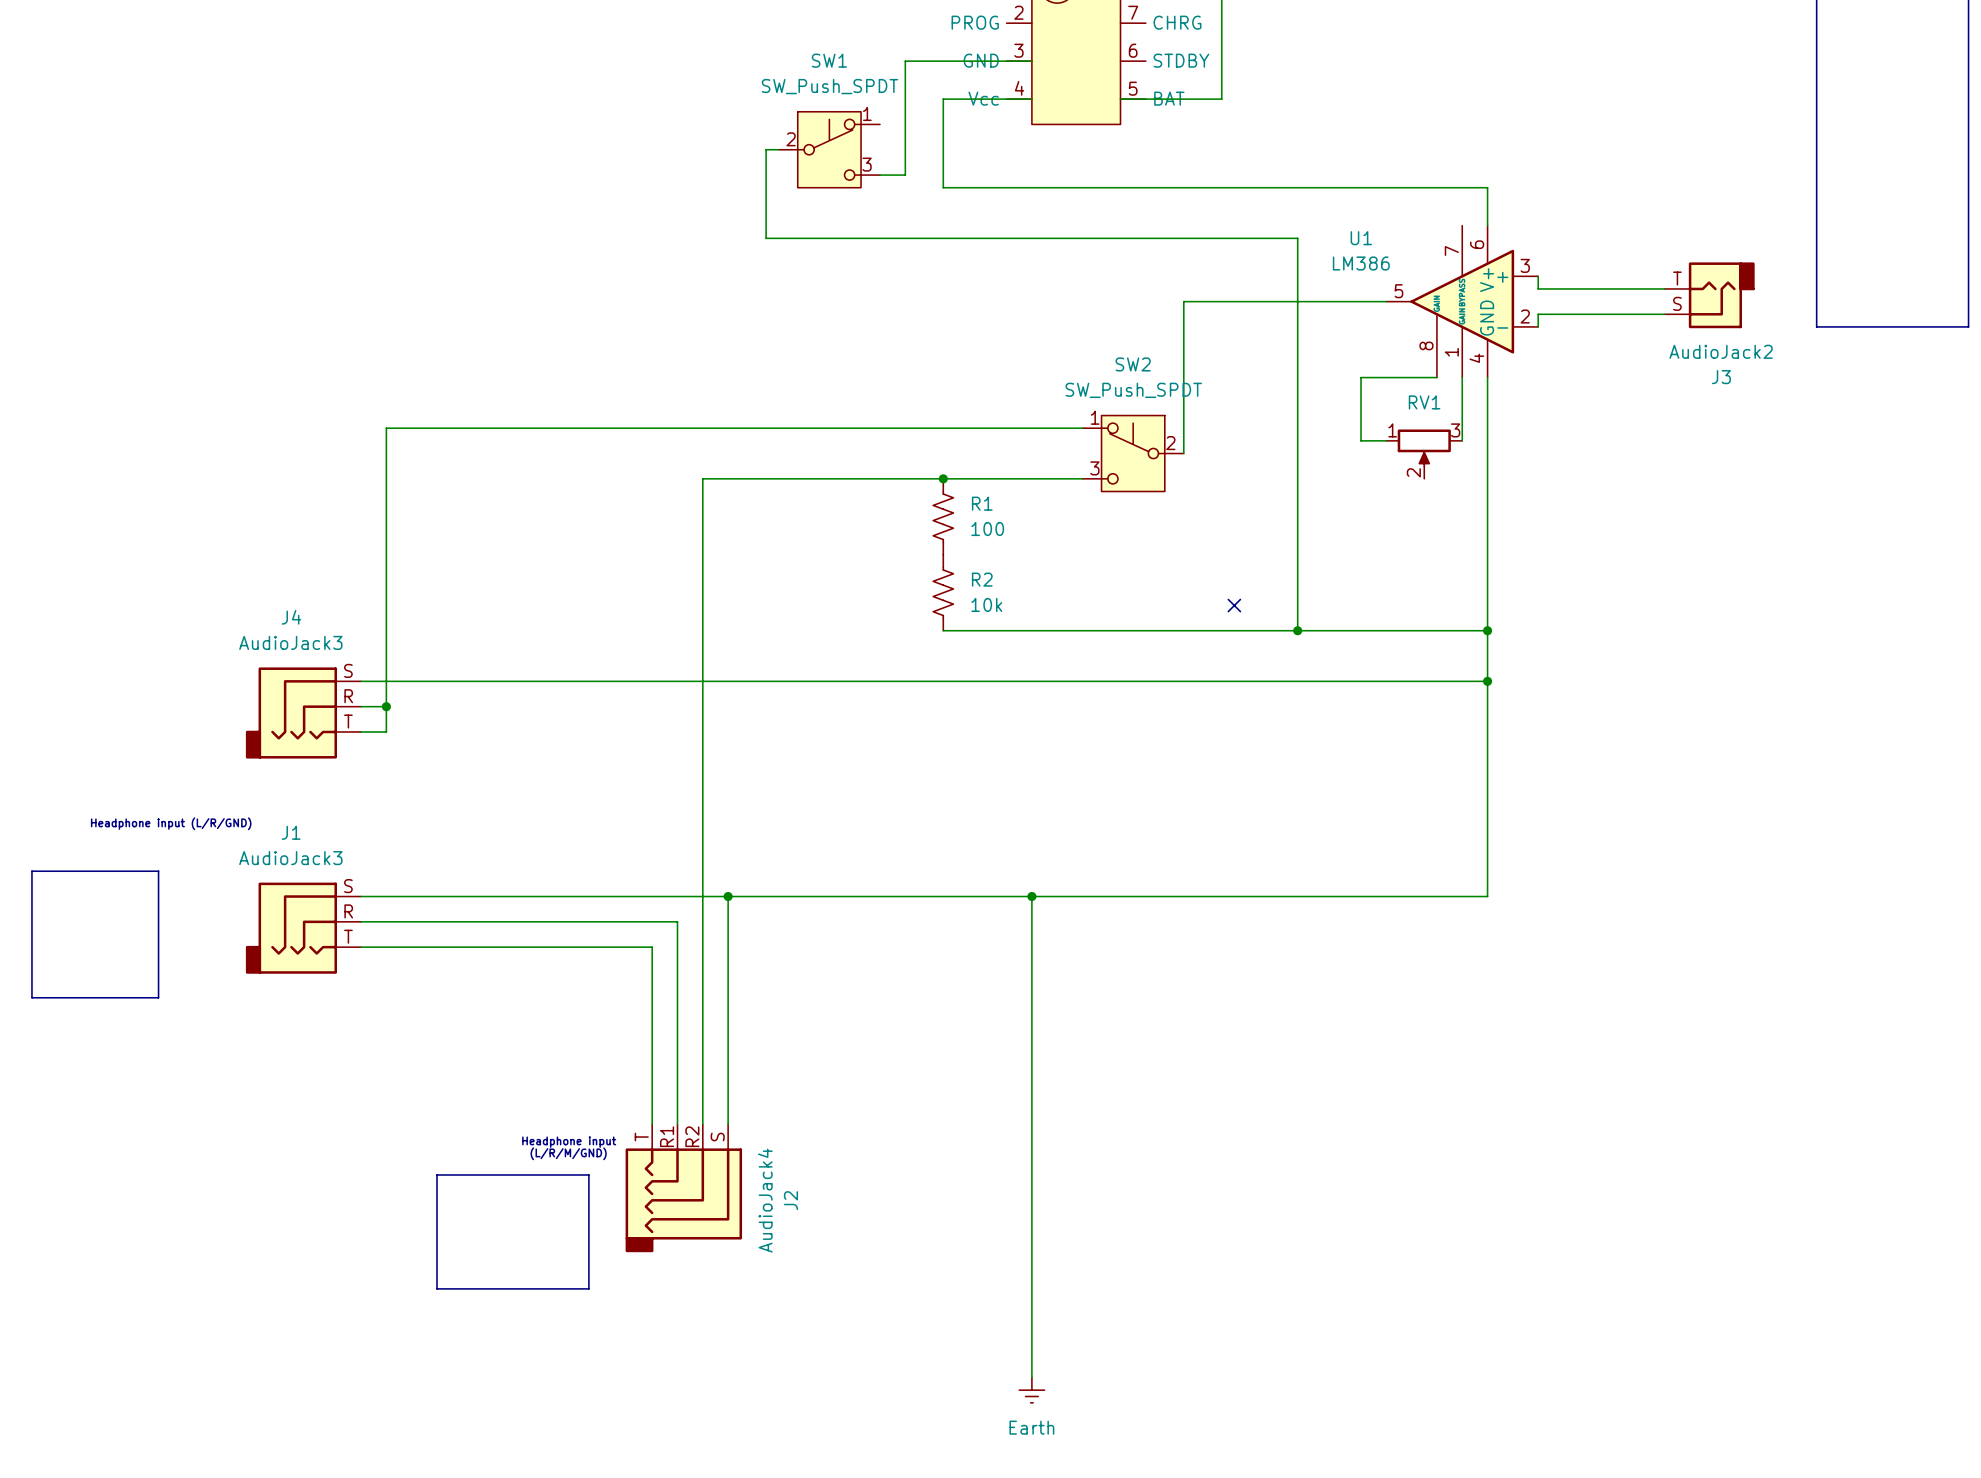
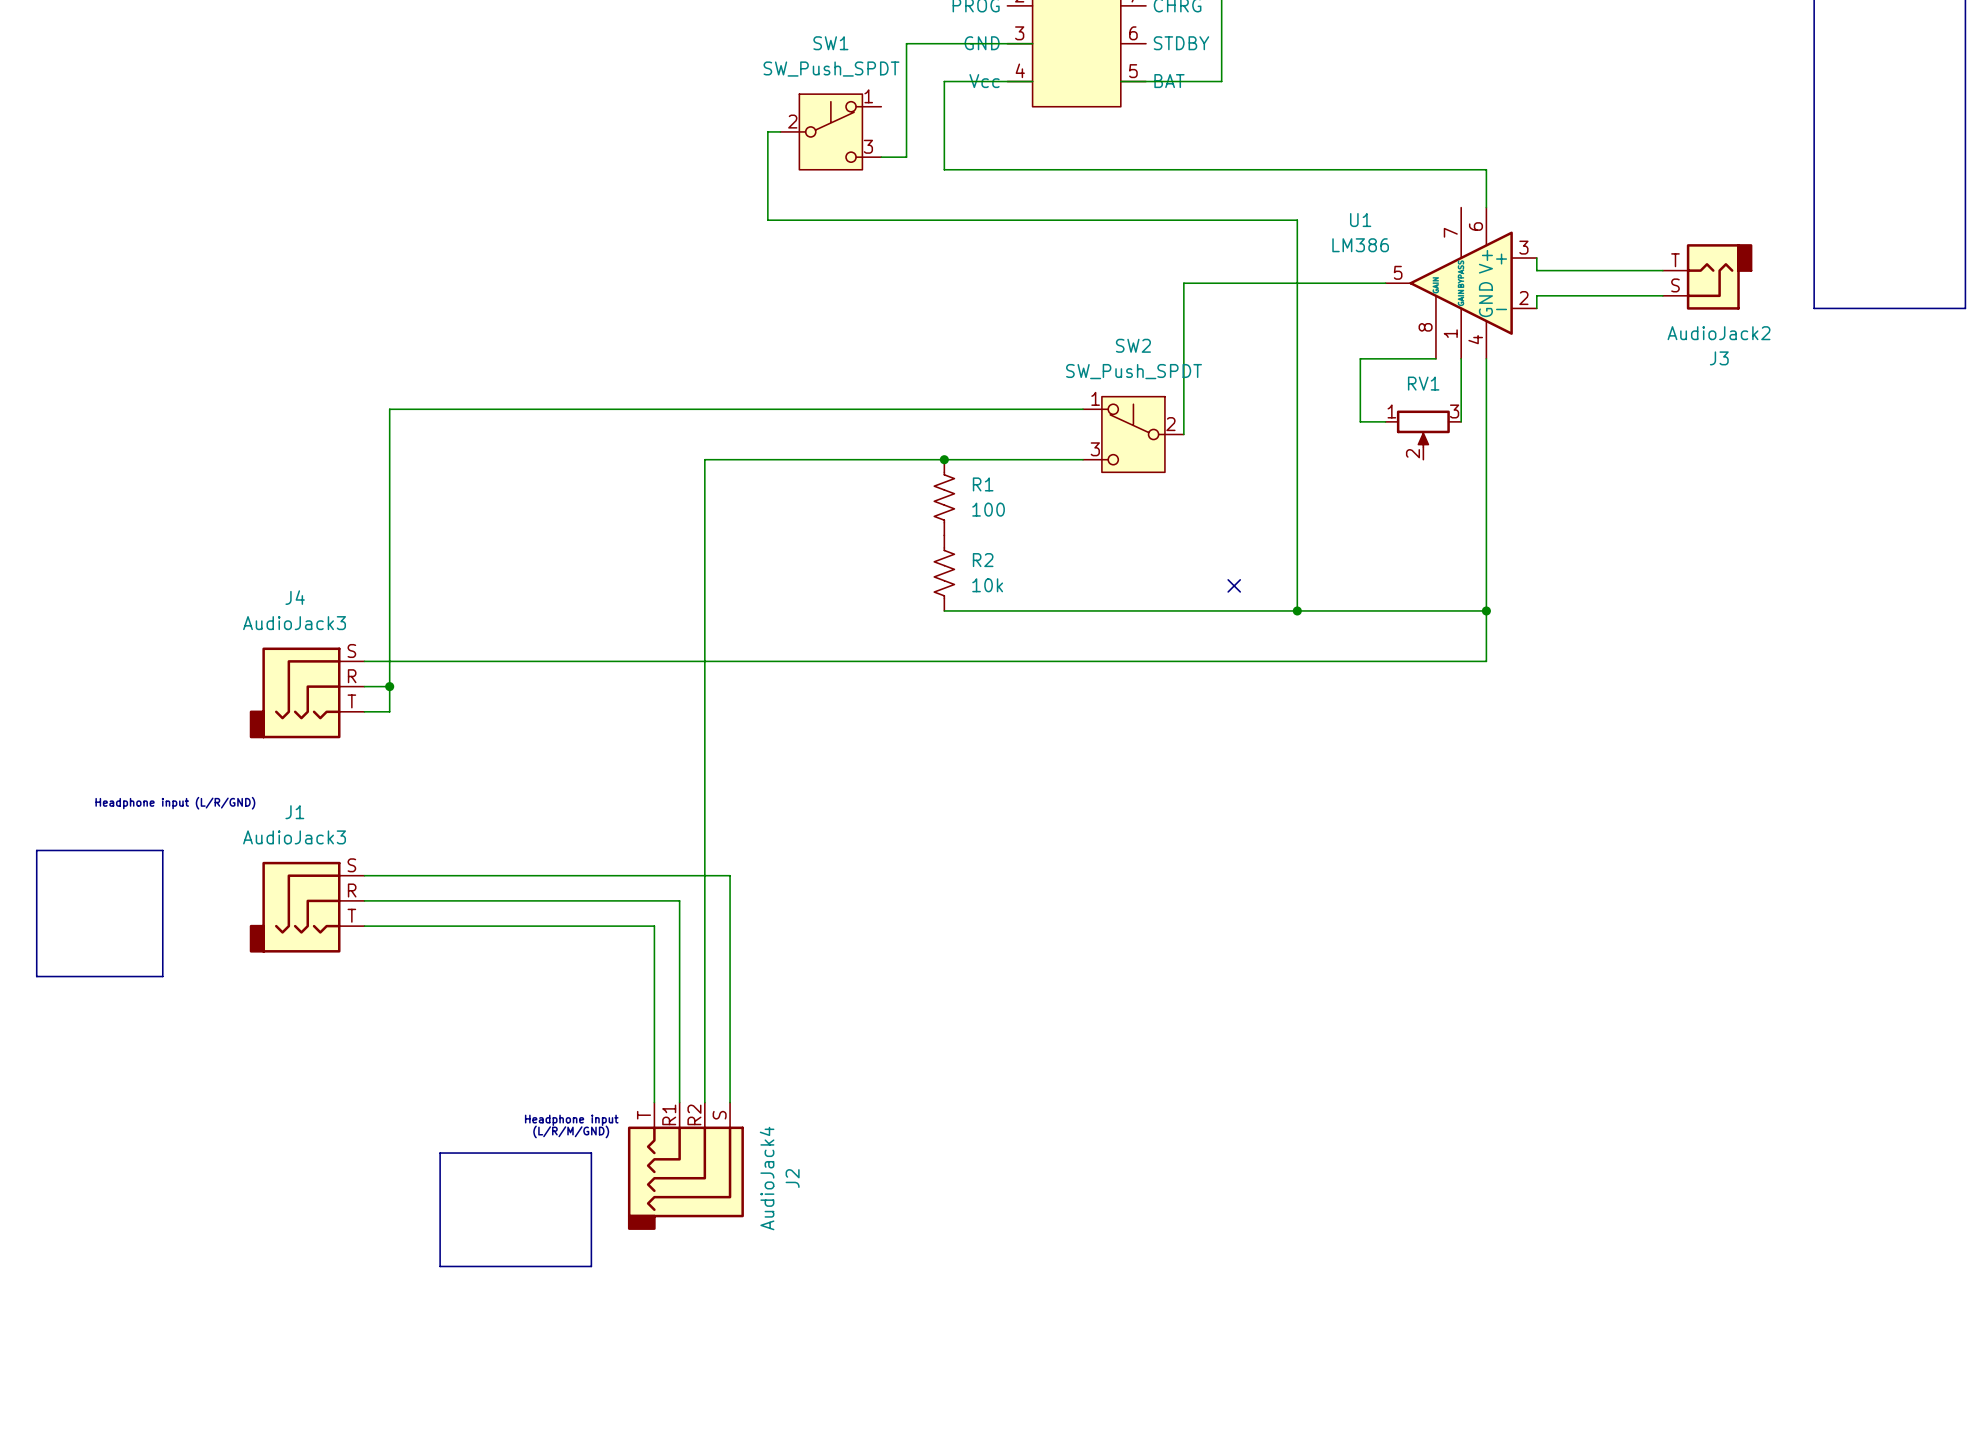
wire: (1487, 681) (1487, 896) (728, 896) -> none
junction: (1487, 681) -> none
junction: (728, 896) -> none
wire: (1031, 896) (1031, 1377) -> none
junction: (1031, 896) -> none
power symbol: Earth (1031, 1390) -> none

